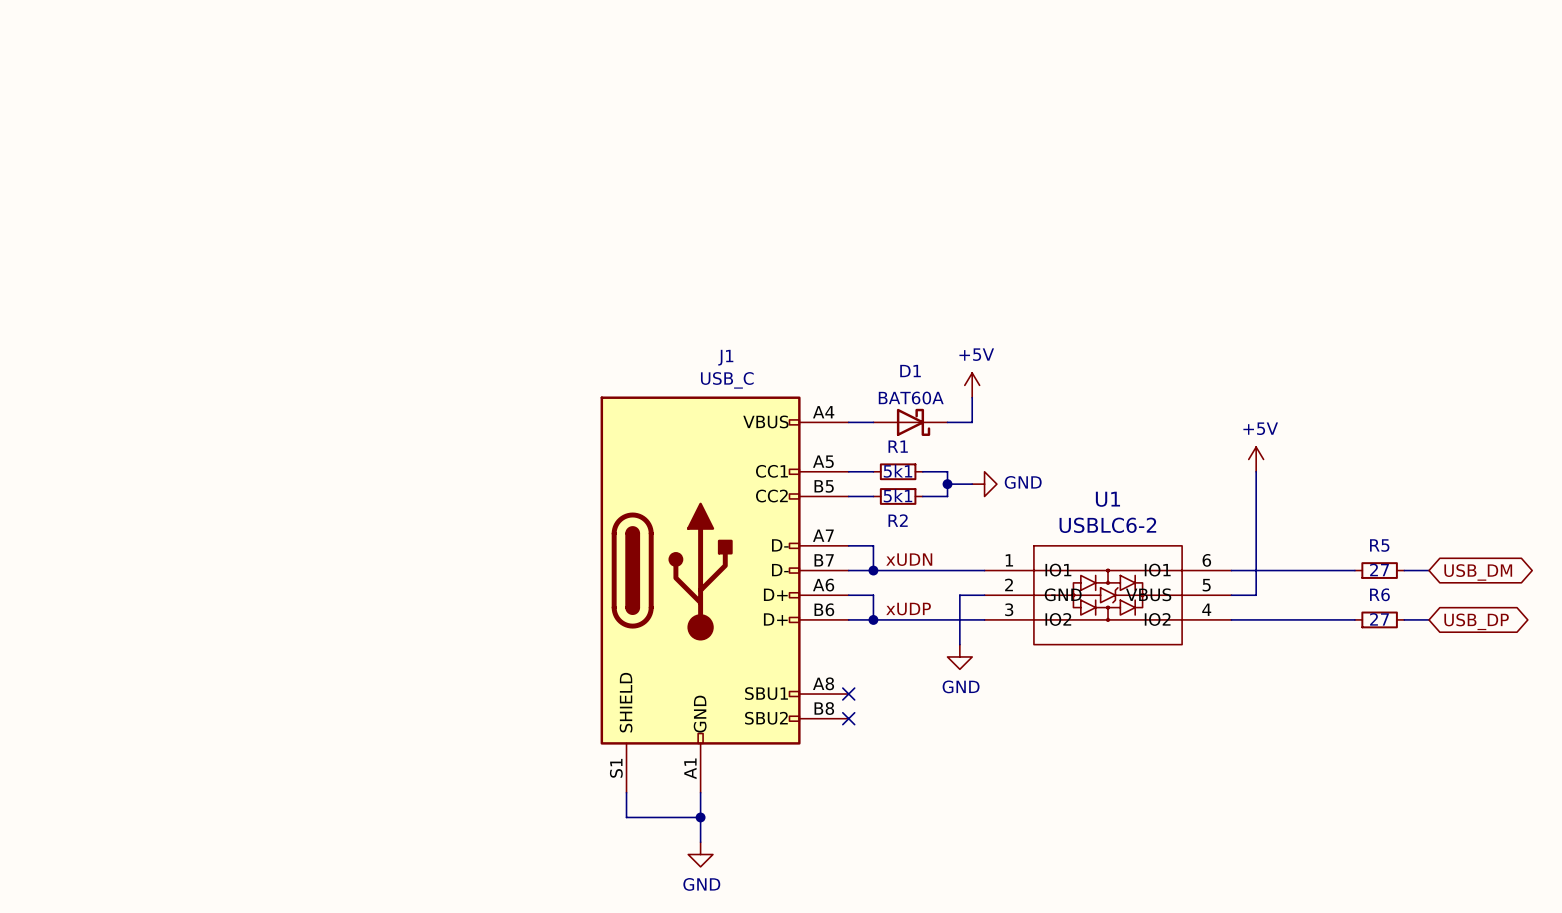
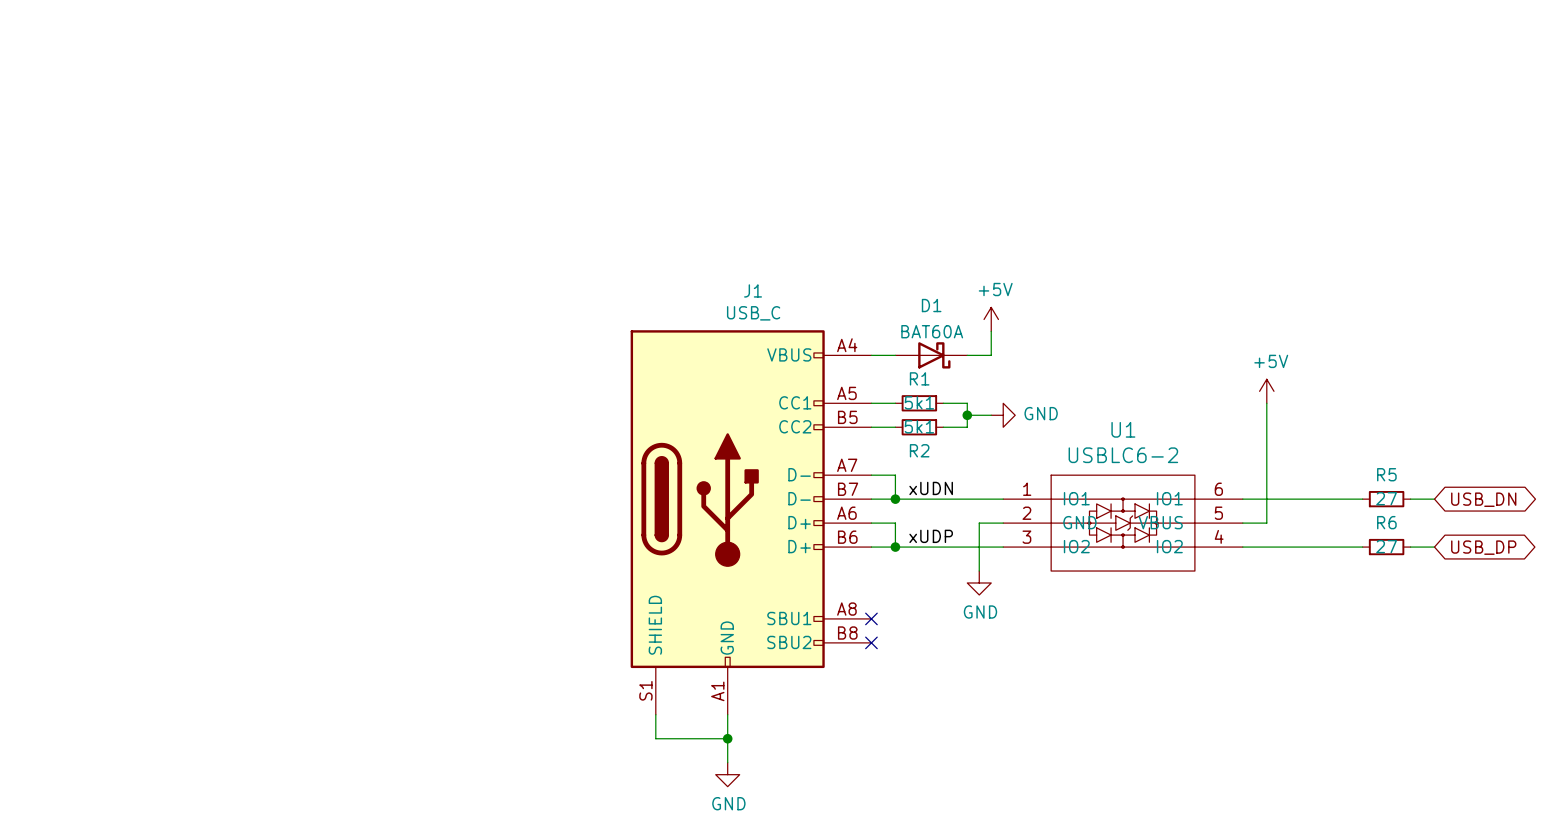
global label: USB_DM (1478, 572) -> USB_DN (1483, 499)

